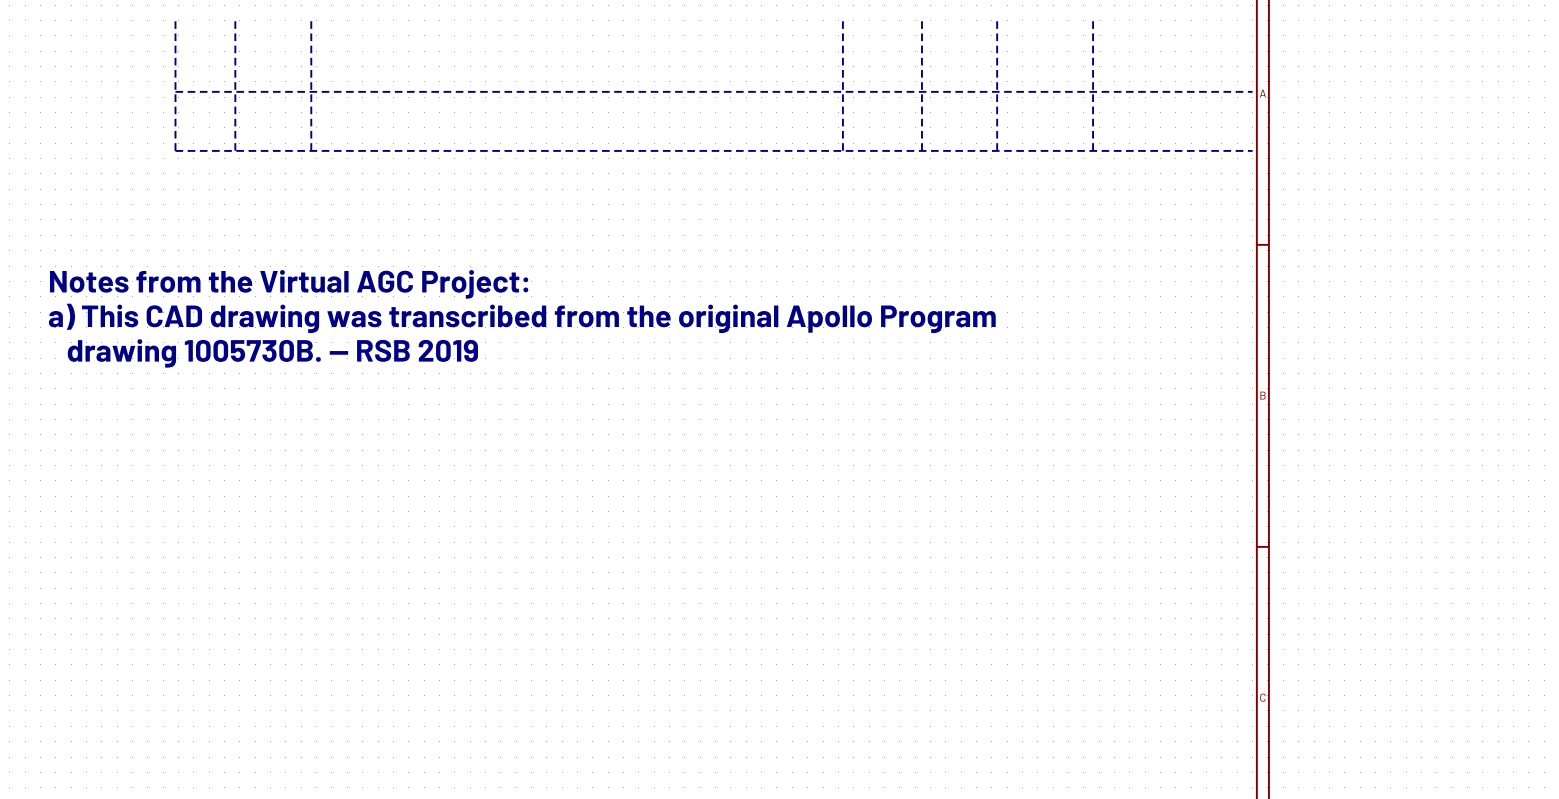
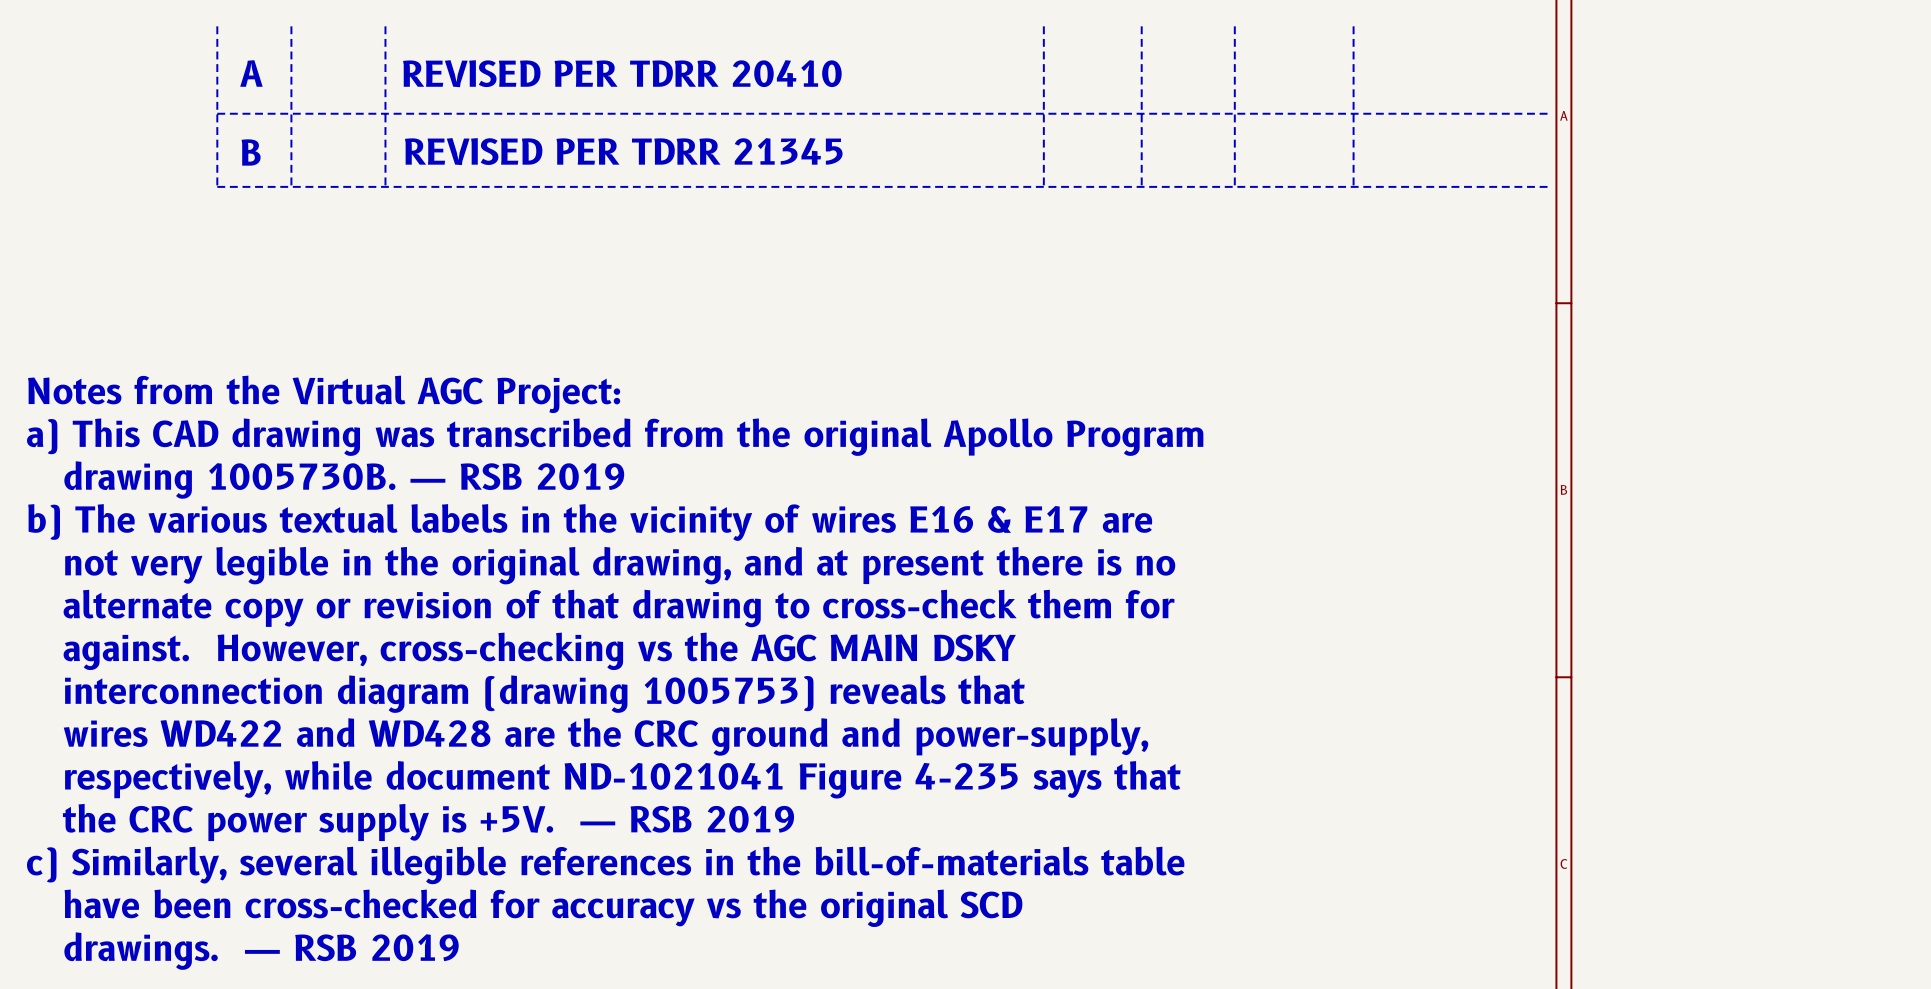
text: none -> A (251, 73)
text: none -> REVISED PER TDRR 20410 (622, 73)
text: none -> REVISED PER TDRR 21345 (623, 151)
text: none -> B (251, 152)
text position: Notes from the Virtual AGC Project: (289, 284) -> Notes from the Virtual AGC Project: (324, 394)
text position: a) This CAD drawing was transcribed from the original Apollo Program (522, 318) -> a) This CAD drawing was transcribed from the original Apollo Program (615, 437)
text position: drawing 1005730B. — RSB 2019 (272, 353) -> drawing 1005730B. — RSB 2019 (344, 480)
text: none -> b) The various textual labels in the vicinity of wires E16 & E17 are (590, 522)
text: none -> not very legible in the original drawing, and at present there is no (620, 565)
text: none -> alternate copy or revision of that drawing to cross-check them for (619, 608)
text: none -> against. However, cross-checking vs the AGC MAIN DSKY (539, 651)
text: none -> interconnection diagram (drawing 1005753) reveals that (544, 694)
text: none -> wires WD422 and WD428 are the CRC ground and power-supply, (606, 736)
text: none -> respectively, while document ND-1021041 Figure 4-235 says that (622, 779)
text: none -> the CRC power supply is +5V. — RSB 2019 (428, 822)
text: none -> c) Similarly, several illegible references in the bill-of-materials table (605, 865)
text: none -> have been cross-checked for accuracy vs the original SCD (543, 908)
text: none -> drawings. — RSB 2019 (261, 951)

